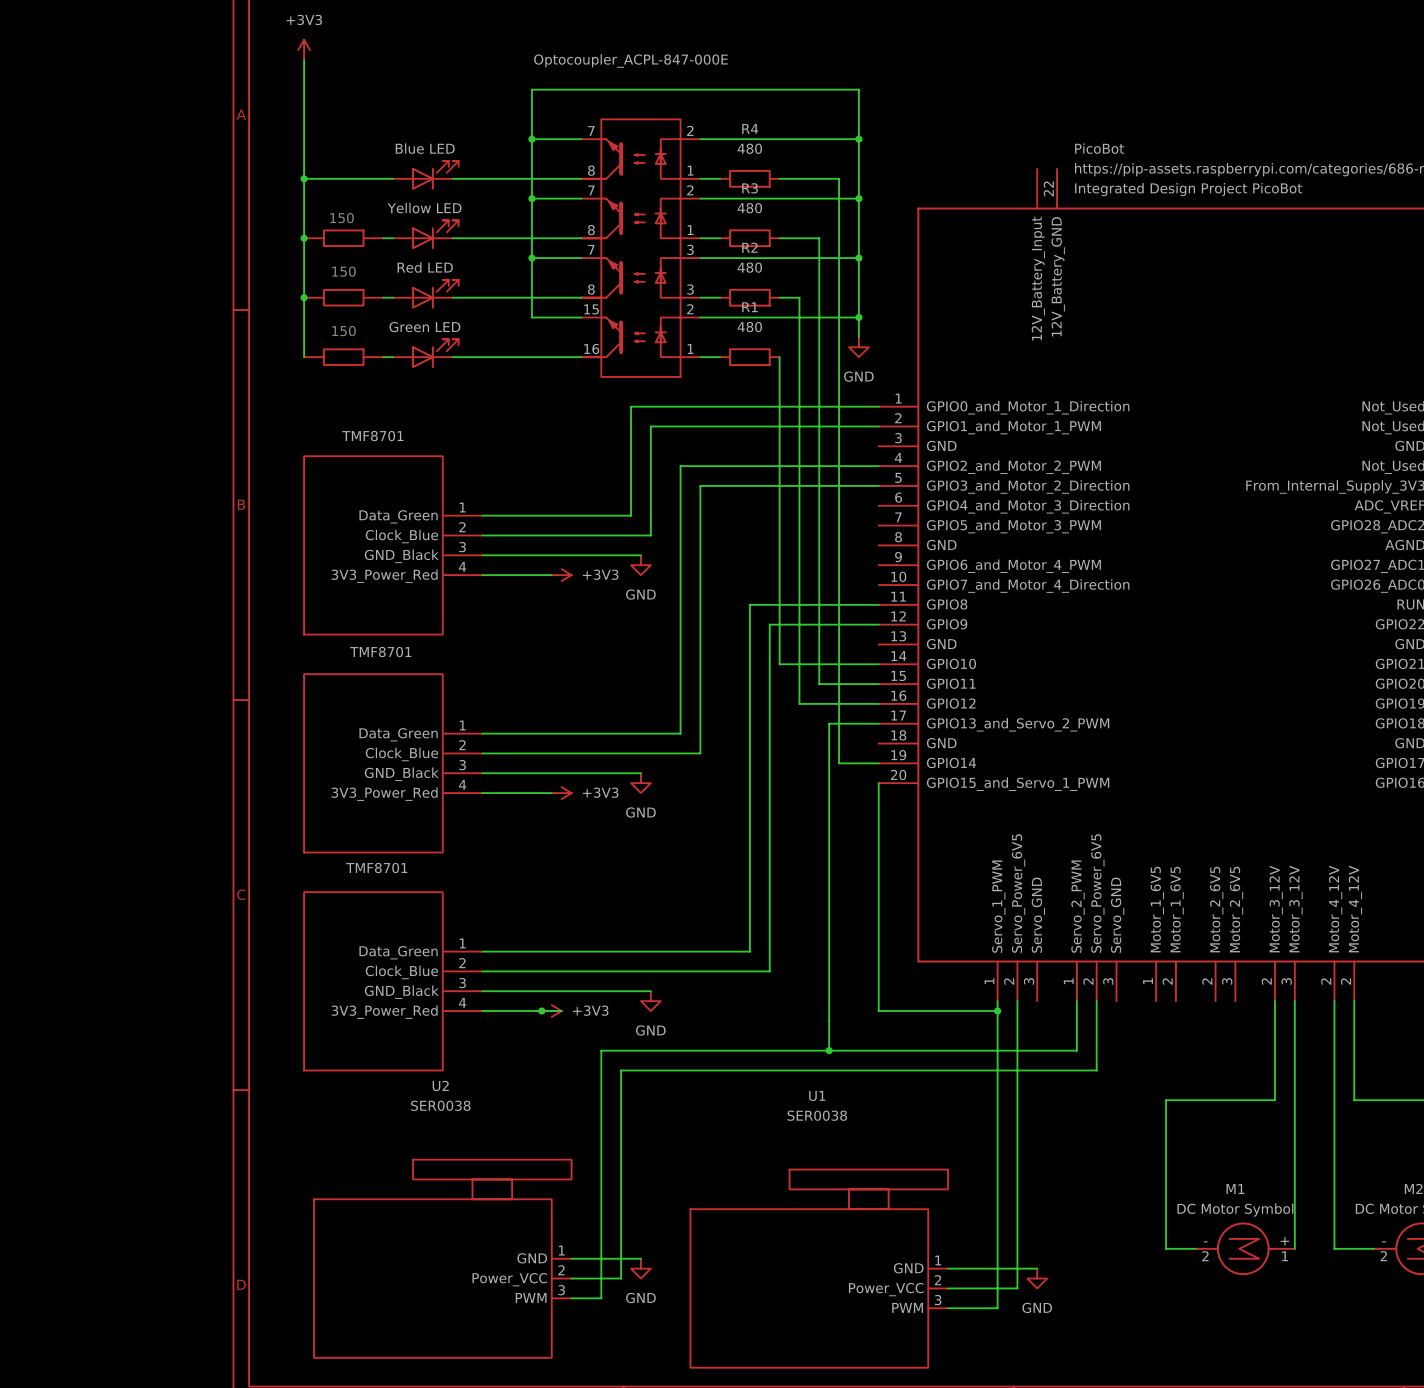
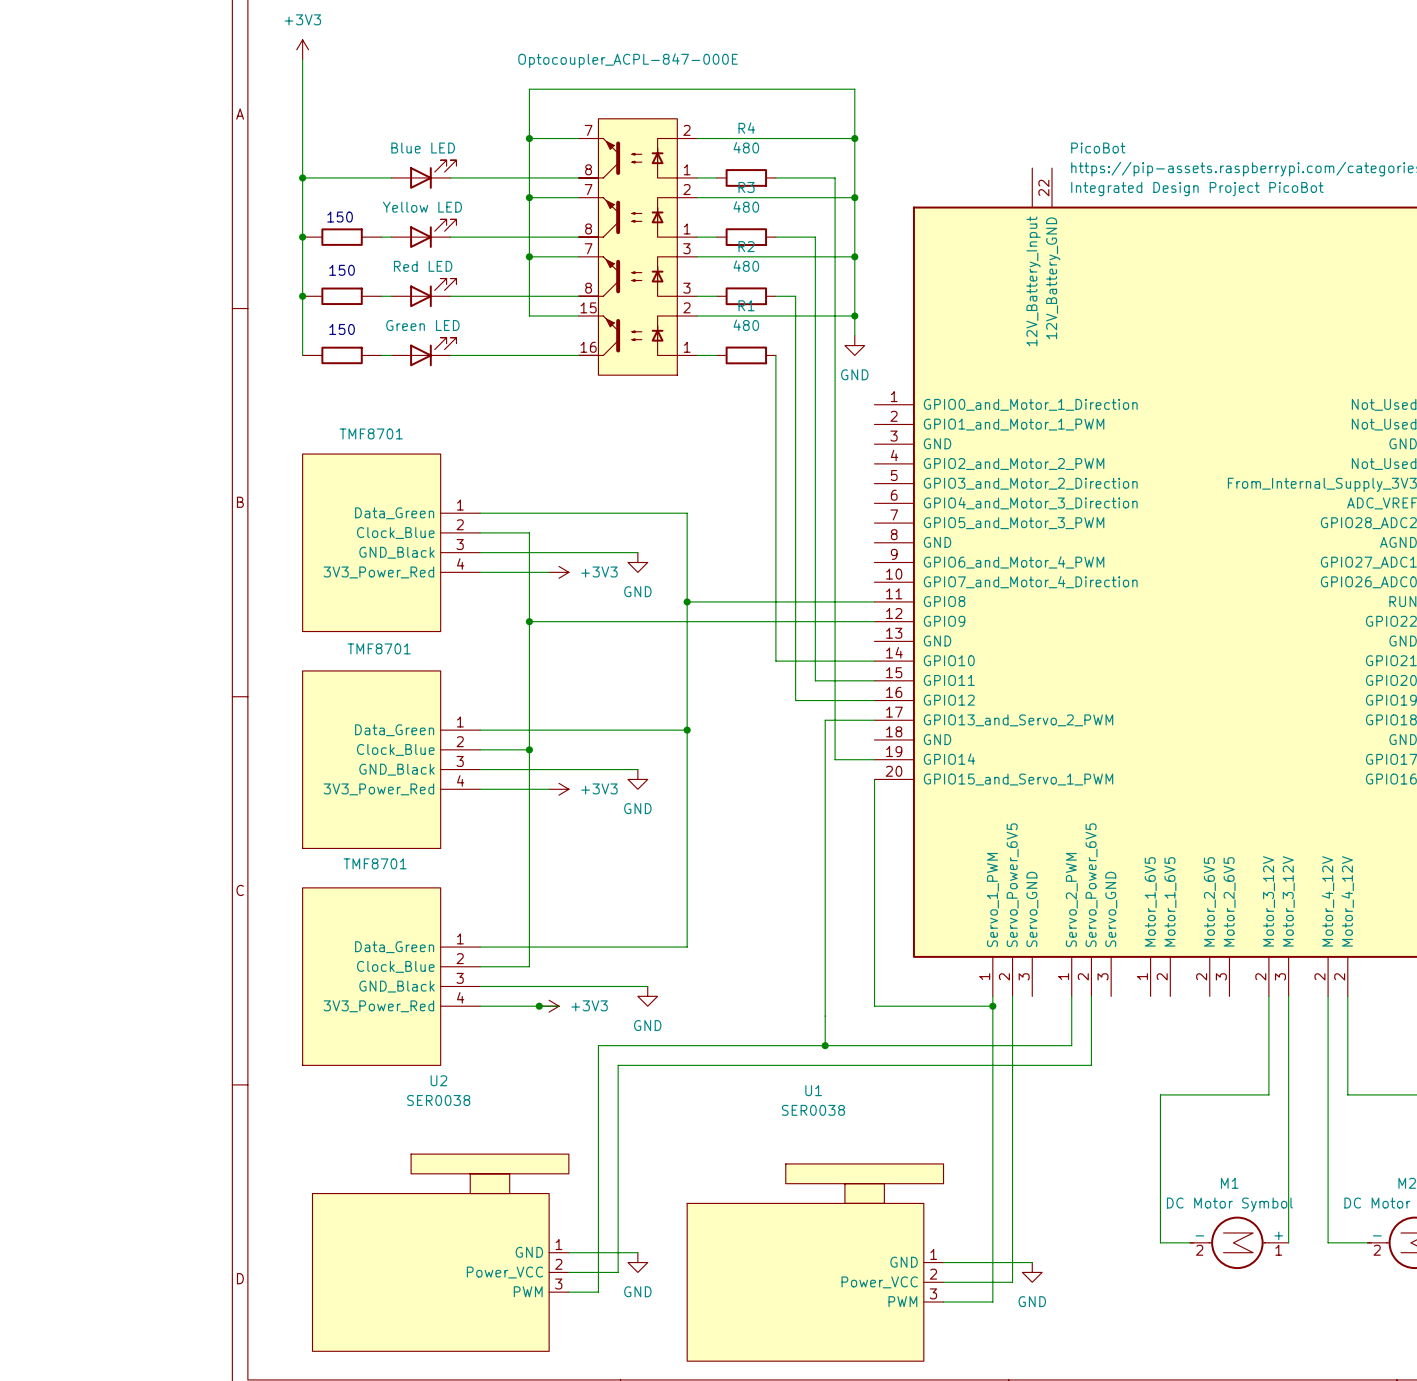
wire: (878, 406) (631, 406) (631, 515) -> none
wire: (878, 426) (650, 426) (650, 535) (531, 535) -> none
wire: (878, 466) (680, 466) (680, 733) -> (687, 730) (677, 730)
wire: (878, 485) (700, 485) (700, 753) (531, 753) -> none
wire: none -> (687, 601) (746, 601)
junction: none -> (687, 601)
wire: (749, 604) (749, 951) (690, 951) -> (628, 513) (687, 513) (687, 947)
wire: none -> (529, 621) (766, 621)
junction: none -> (529, 621)
wire: (769, 624) (769, 971) (531, 971) -> (529, 532) (529, 966)
junction: none -> (687, 730)
junction: none -> (529, 749)

